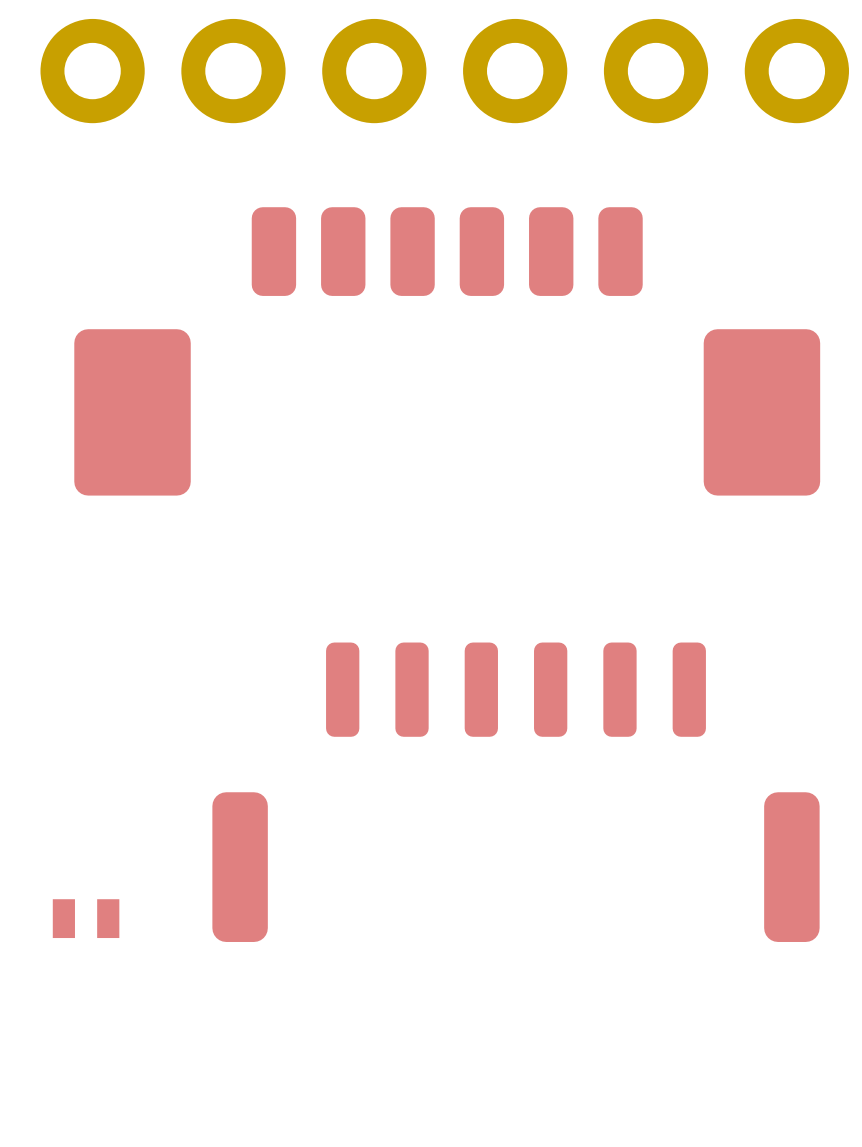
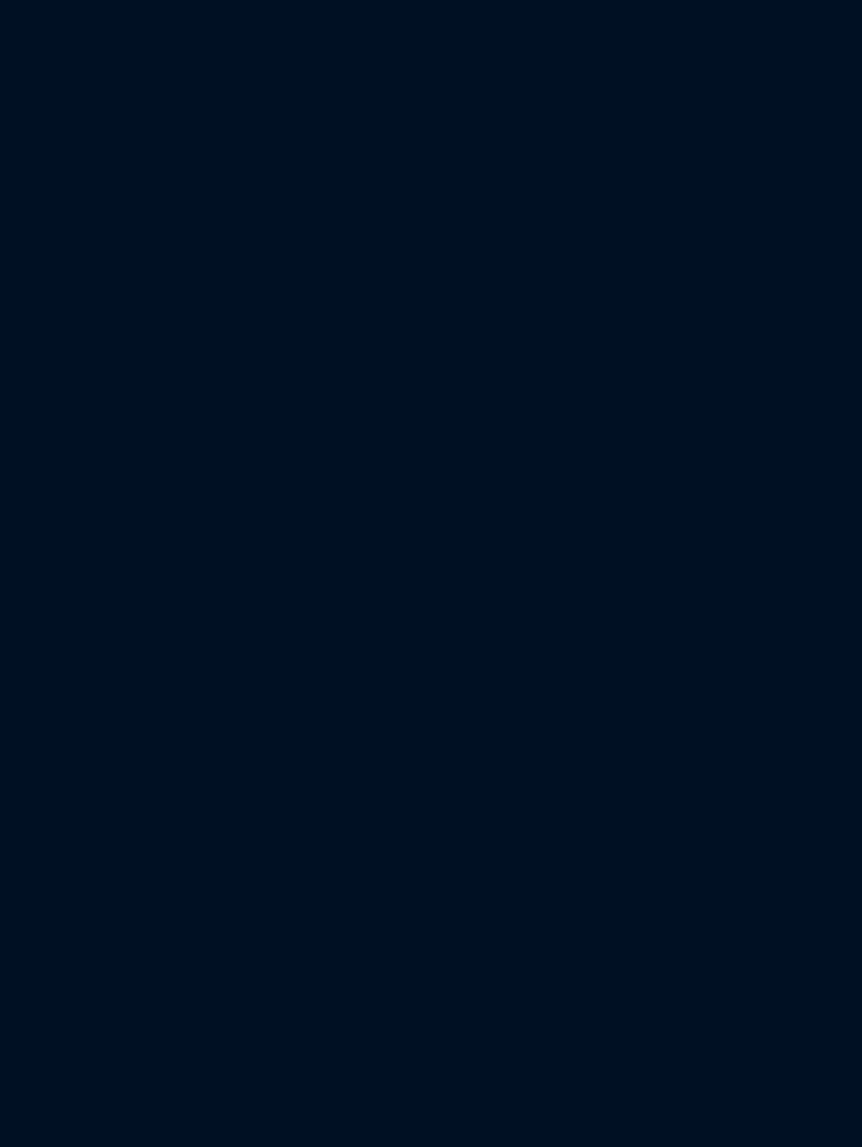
part: (444, 71) -> none
part: (447, 351) -> none
part: (515, 792) -> none
part: (86, 918) -> none

